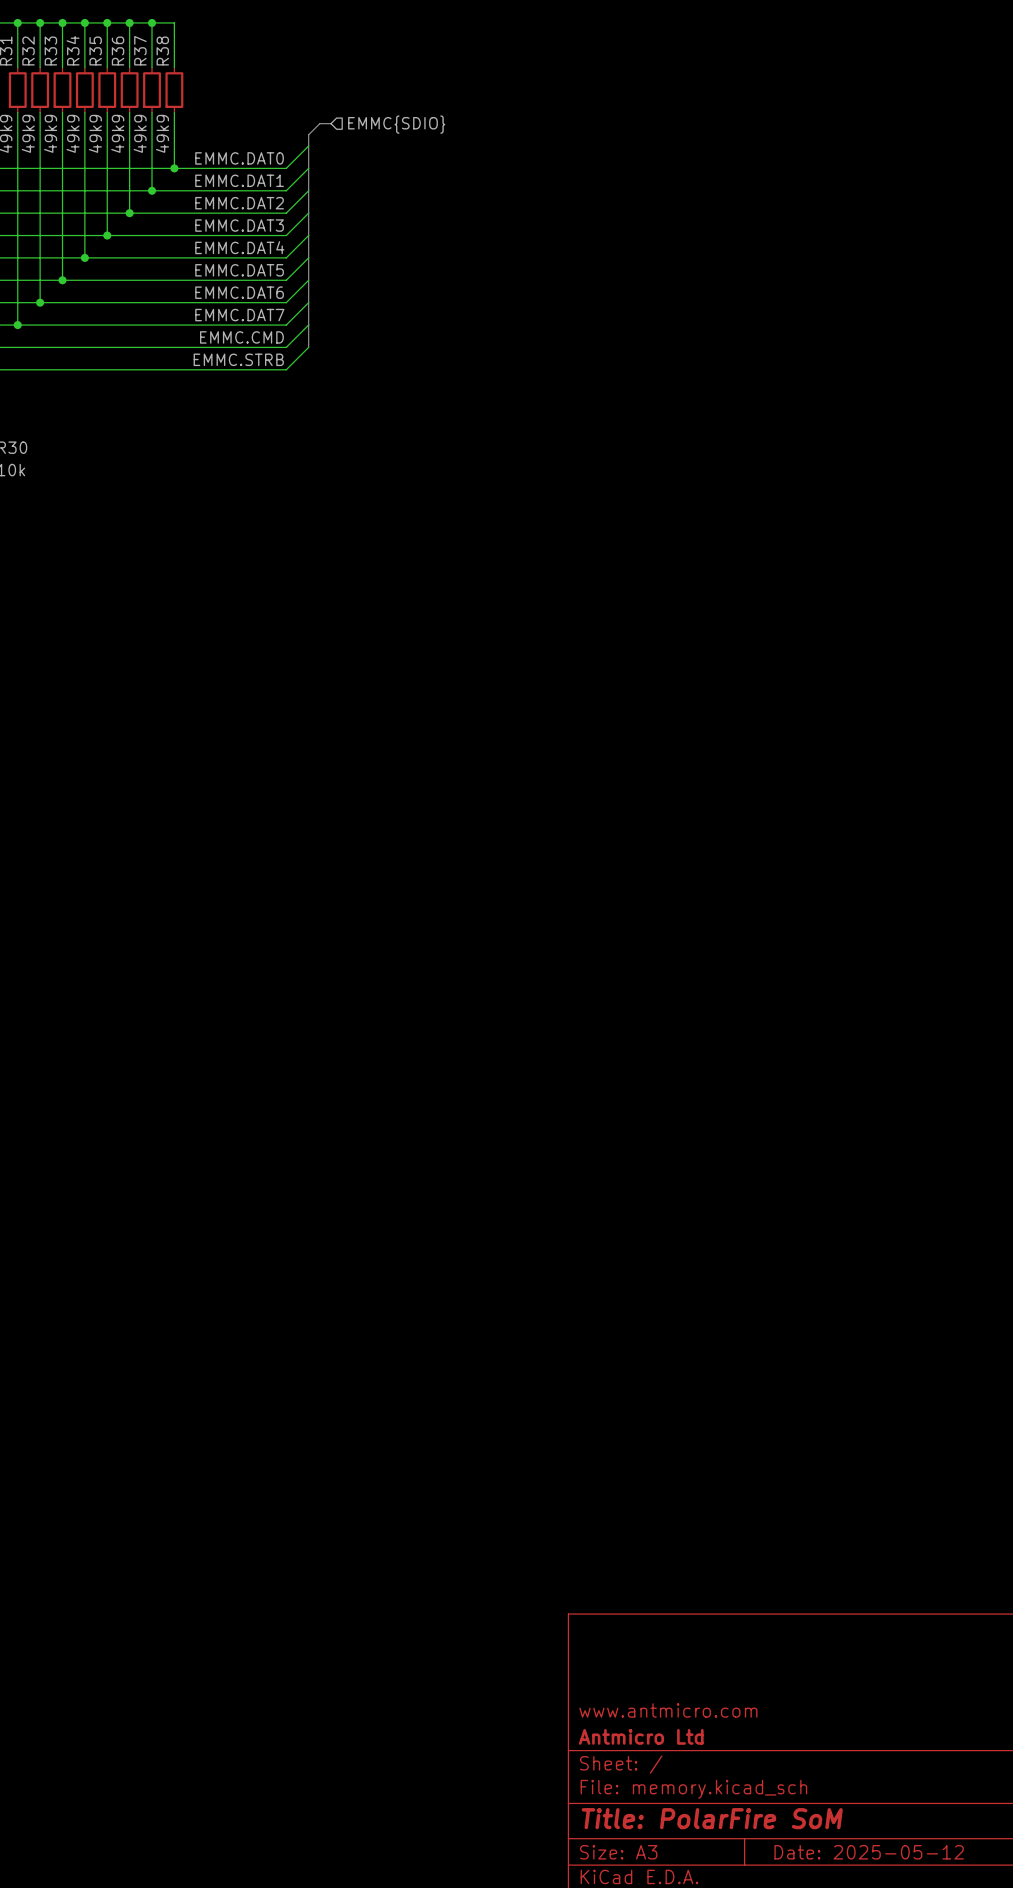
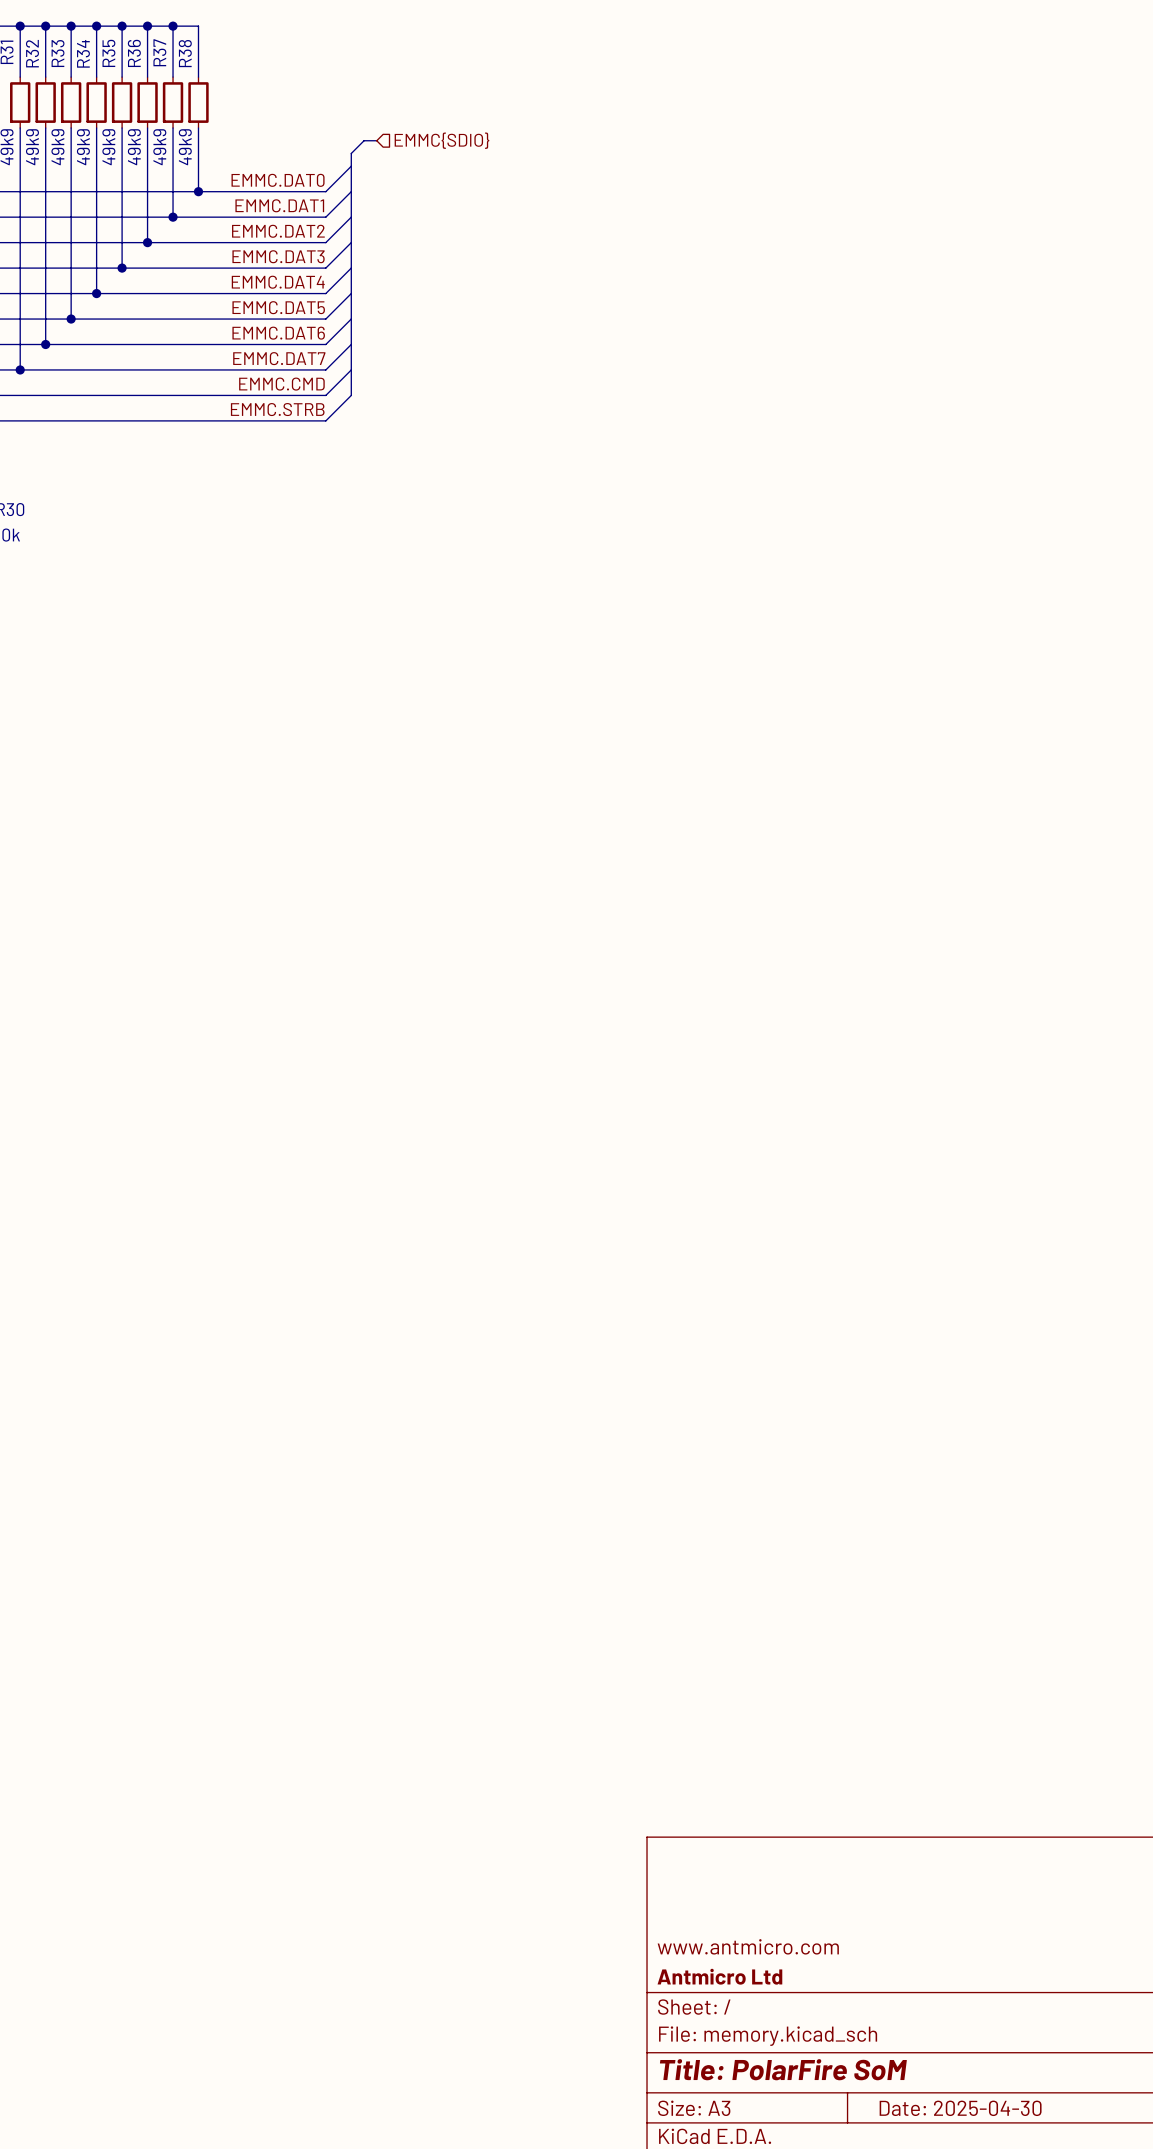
title block: Date: 2025-05-12 (869, 1852) -> Date: 2025-04-30 (960, 2108)

